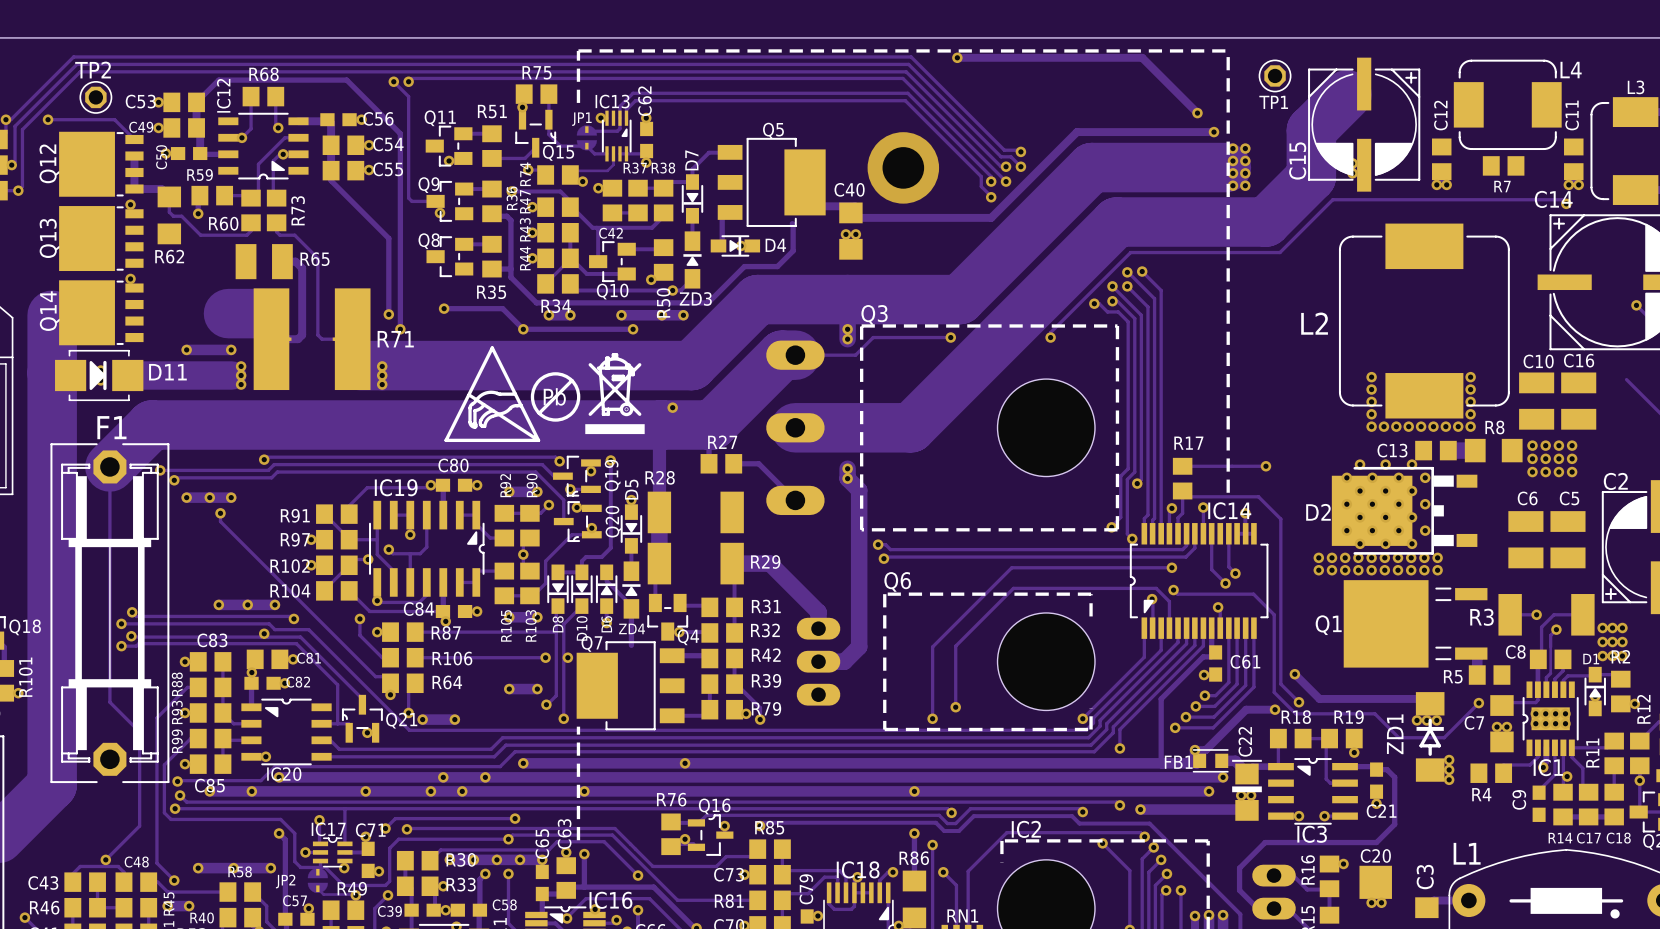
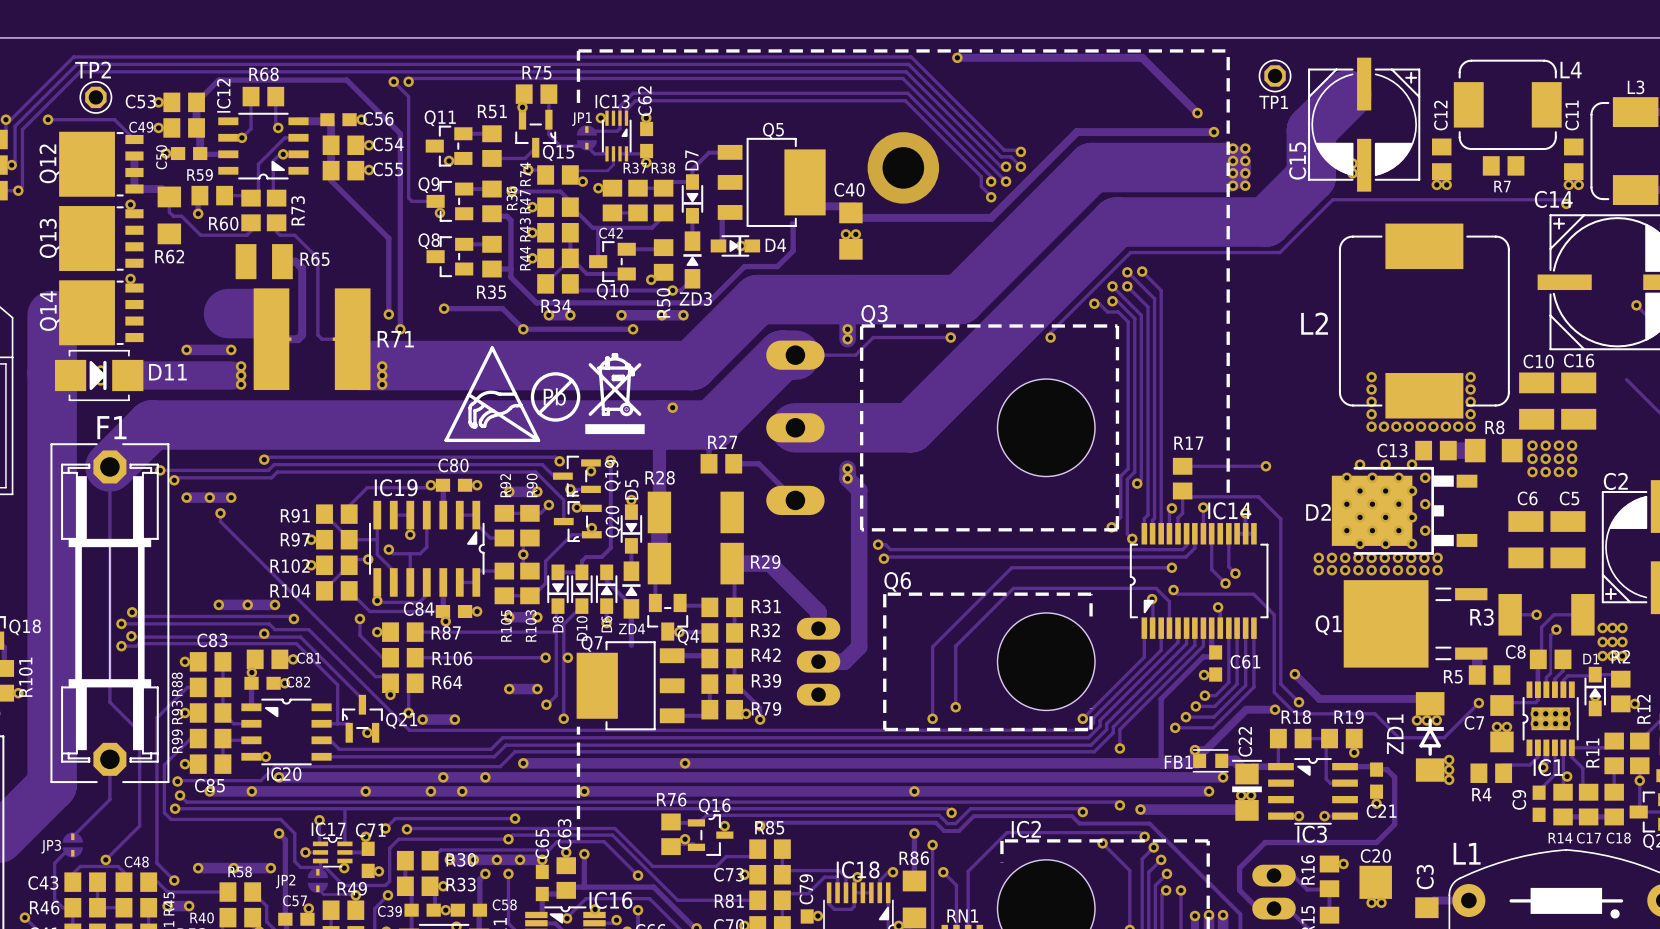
track: none -> (109, 759) (109, 799) (72, 836)
JP3: none -> (72, 845)
track: none -> (72, 853) (66, 851) (54, 863) (54, 899) (62, 907) (72, 907)

